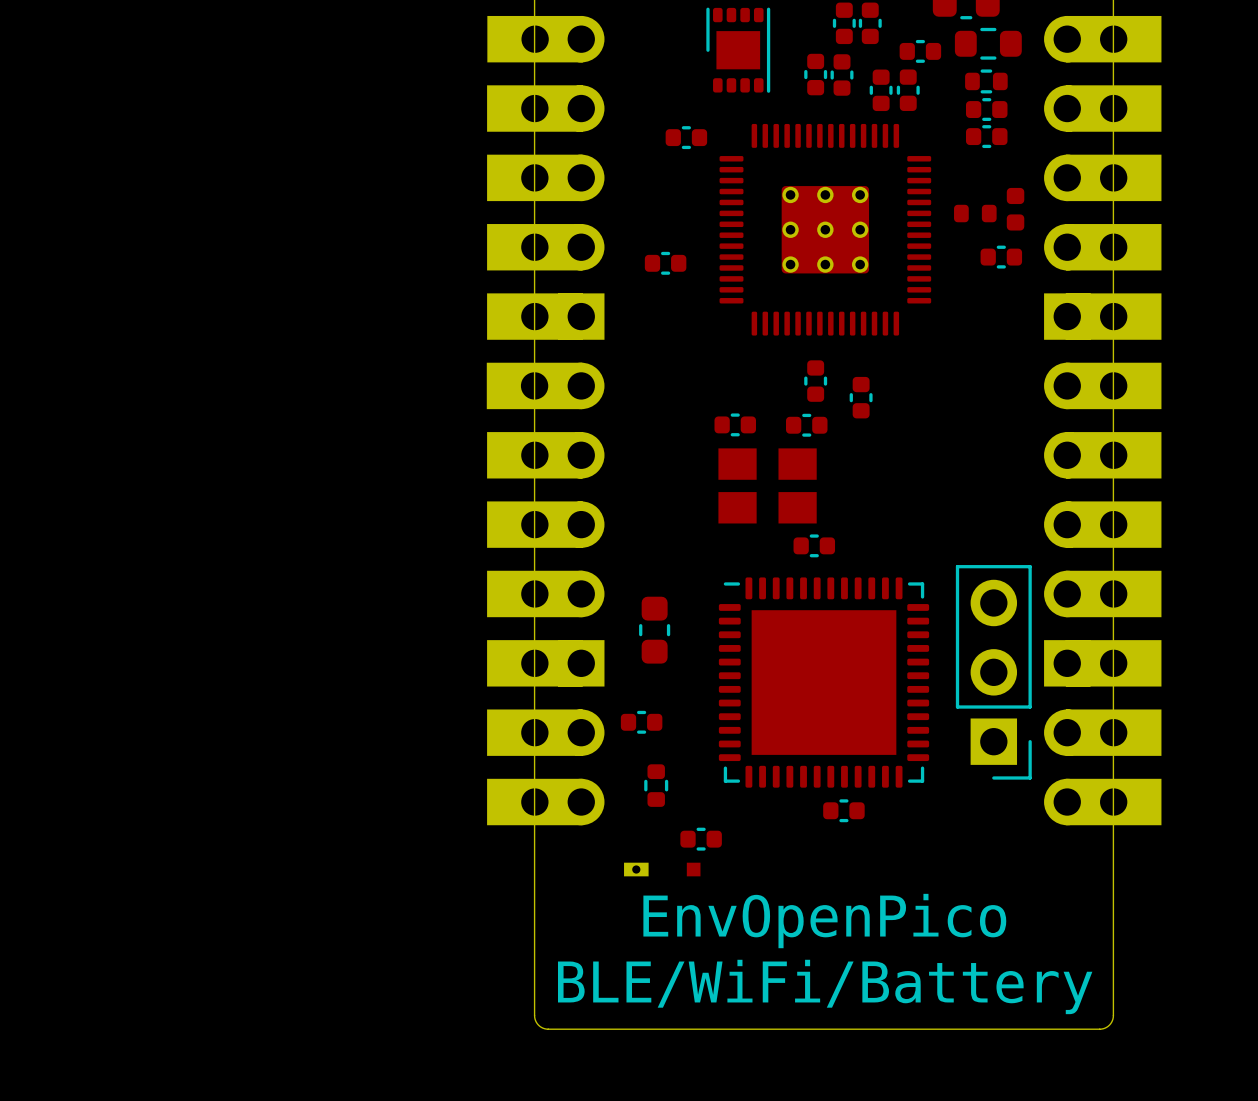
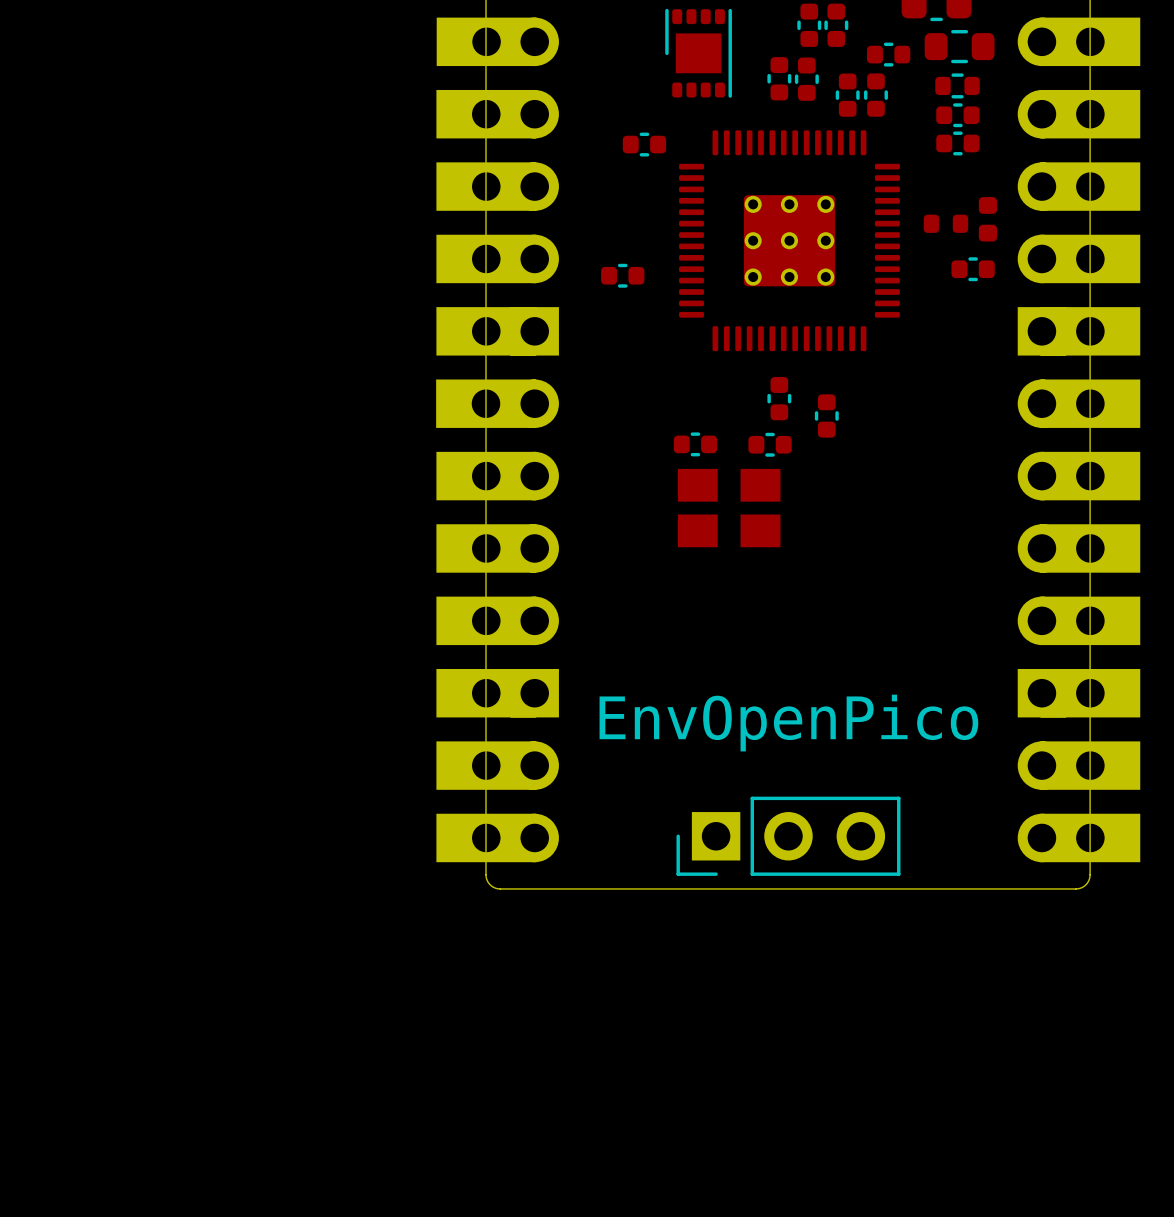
part: (814, 545) -> none
part: (654, 630) -> none
part: (993, 672) -> none
part: (823, 682) -> none
part: (641, 722) -> none
part: (656, 785) -> none
part footprint: [823, 799, 865, 823] -> [676, 796, 901, 876]
board edge: (534, 837) (534, 1017) (539, 1026) (548, 1029) (1104, 1028) (1110, 1023) (1113, 1015) (1113, 837) -> (485, 874) (490, 884) (500, 888) (1075, 888) (1085, 884) (1090, 874)
part: (701, 839) -> none
part: (662, 869) -> none
text position: EnvOpenPico (824, 921) -> EnvOpenPico (788, 723)
text: BLE/WiFi/Battery (825, 986) -> none

